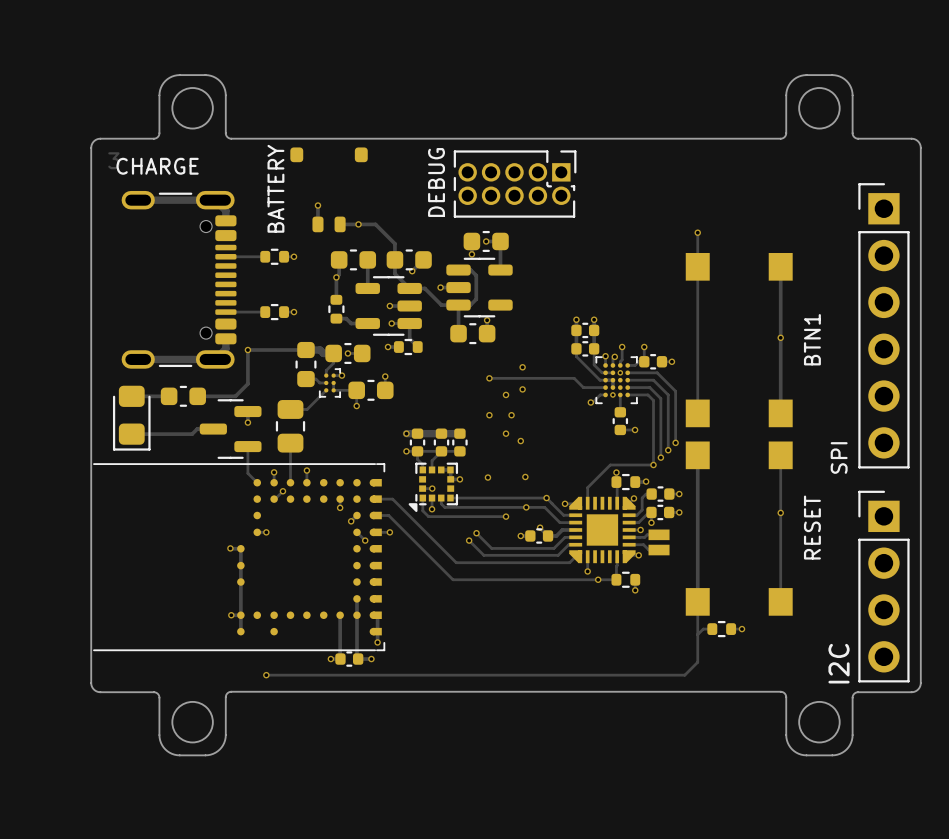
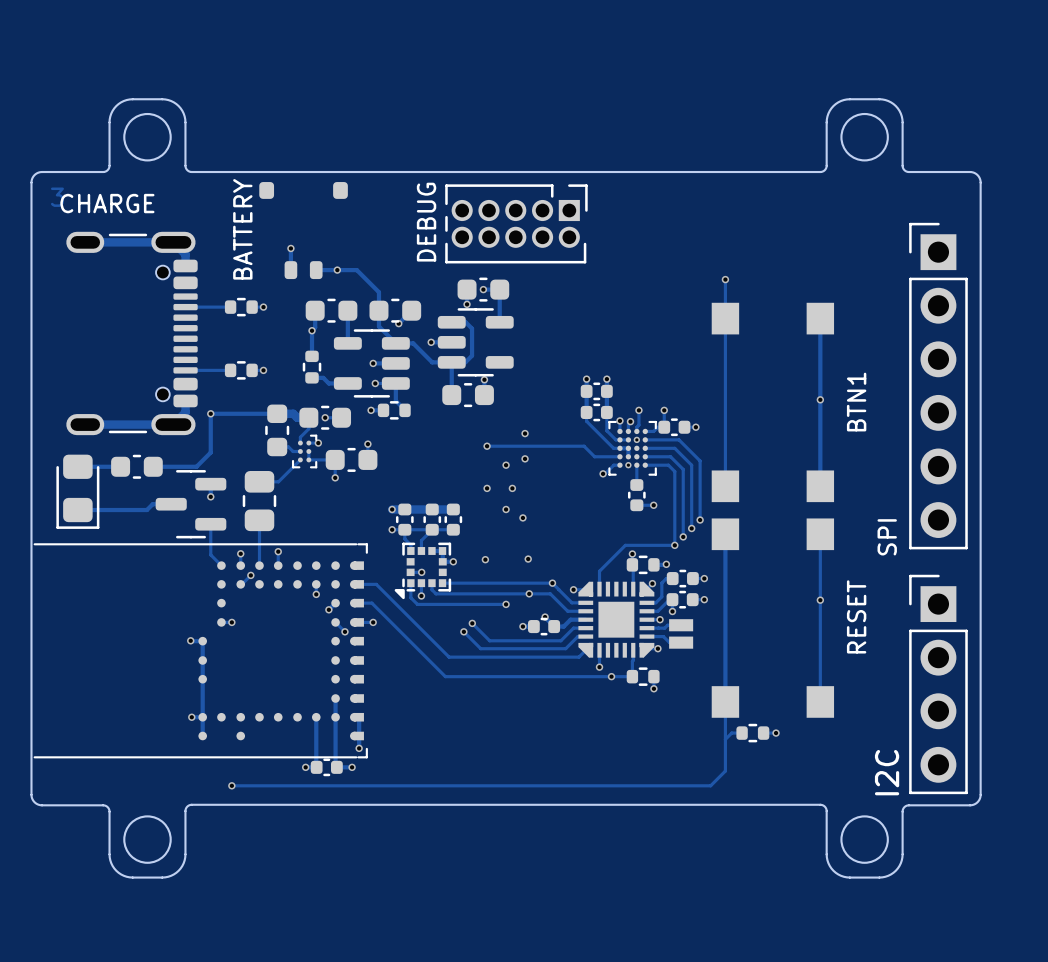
part footprint: [453, 150, 577, 218] -> [445, 184, 588, 264]

